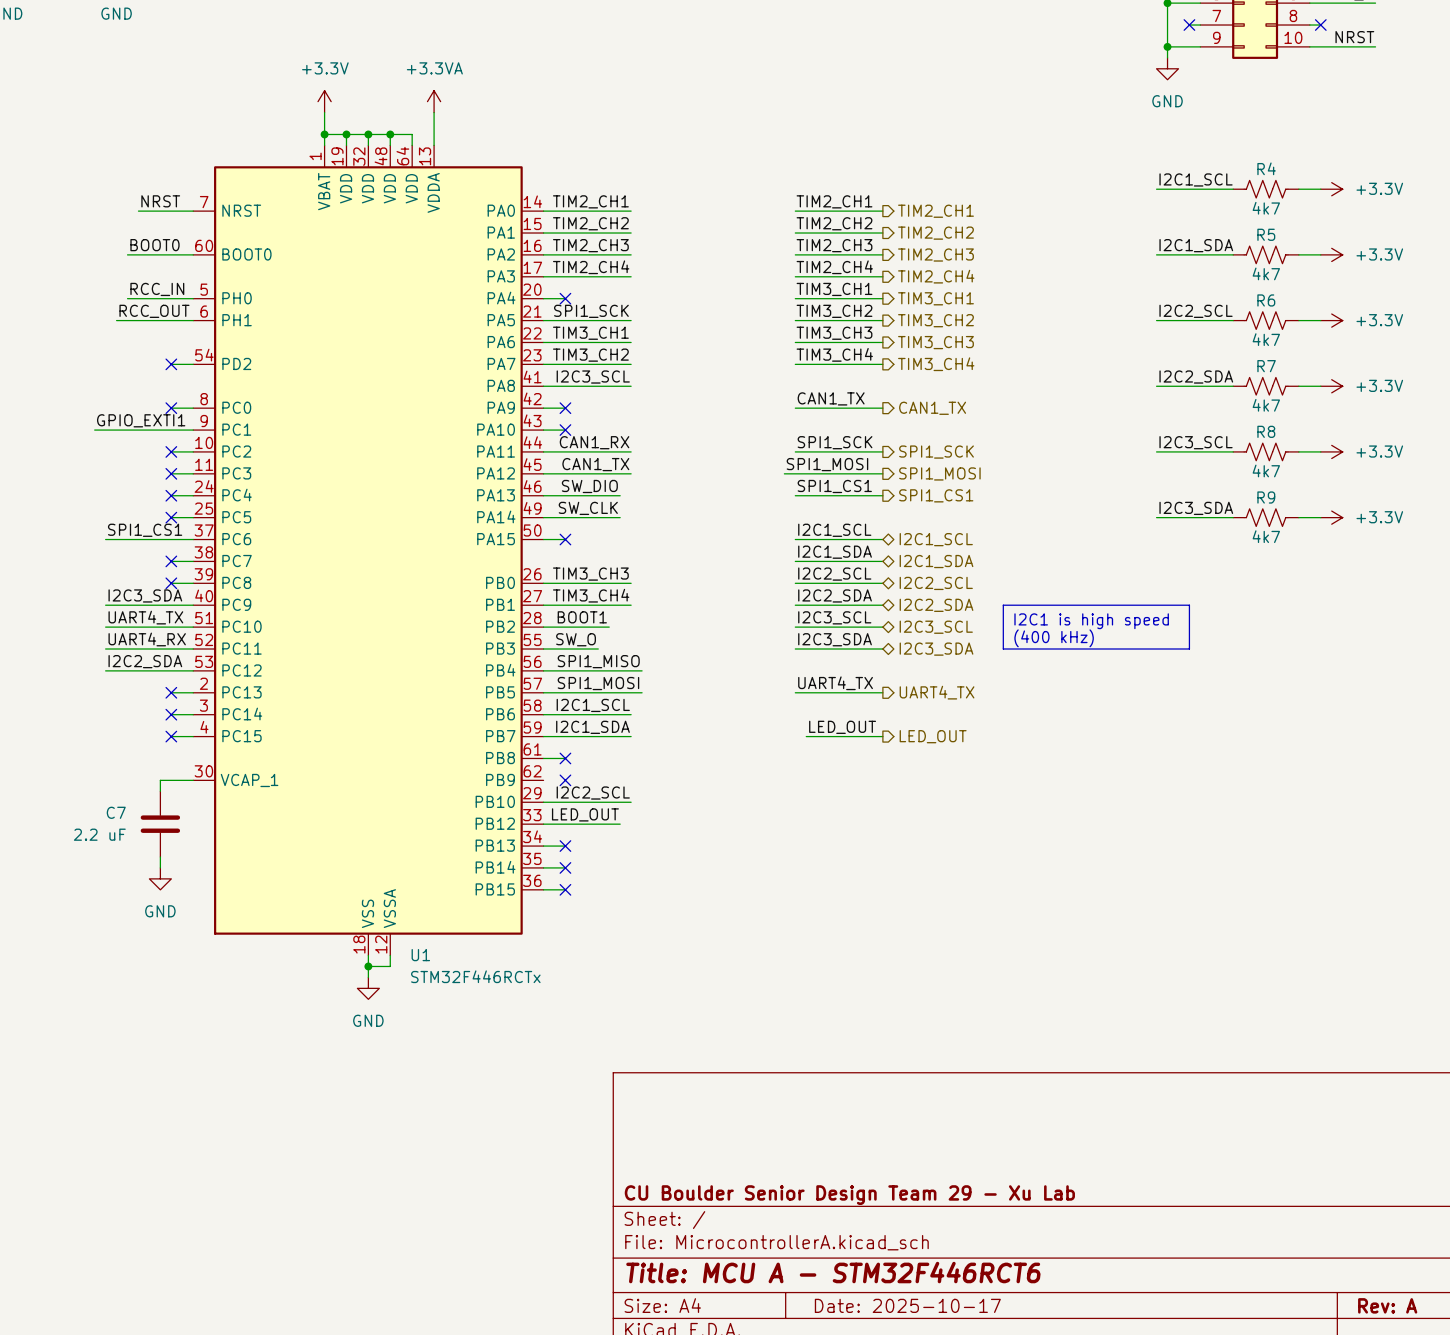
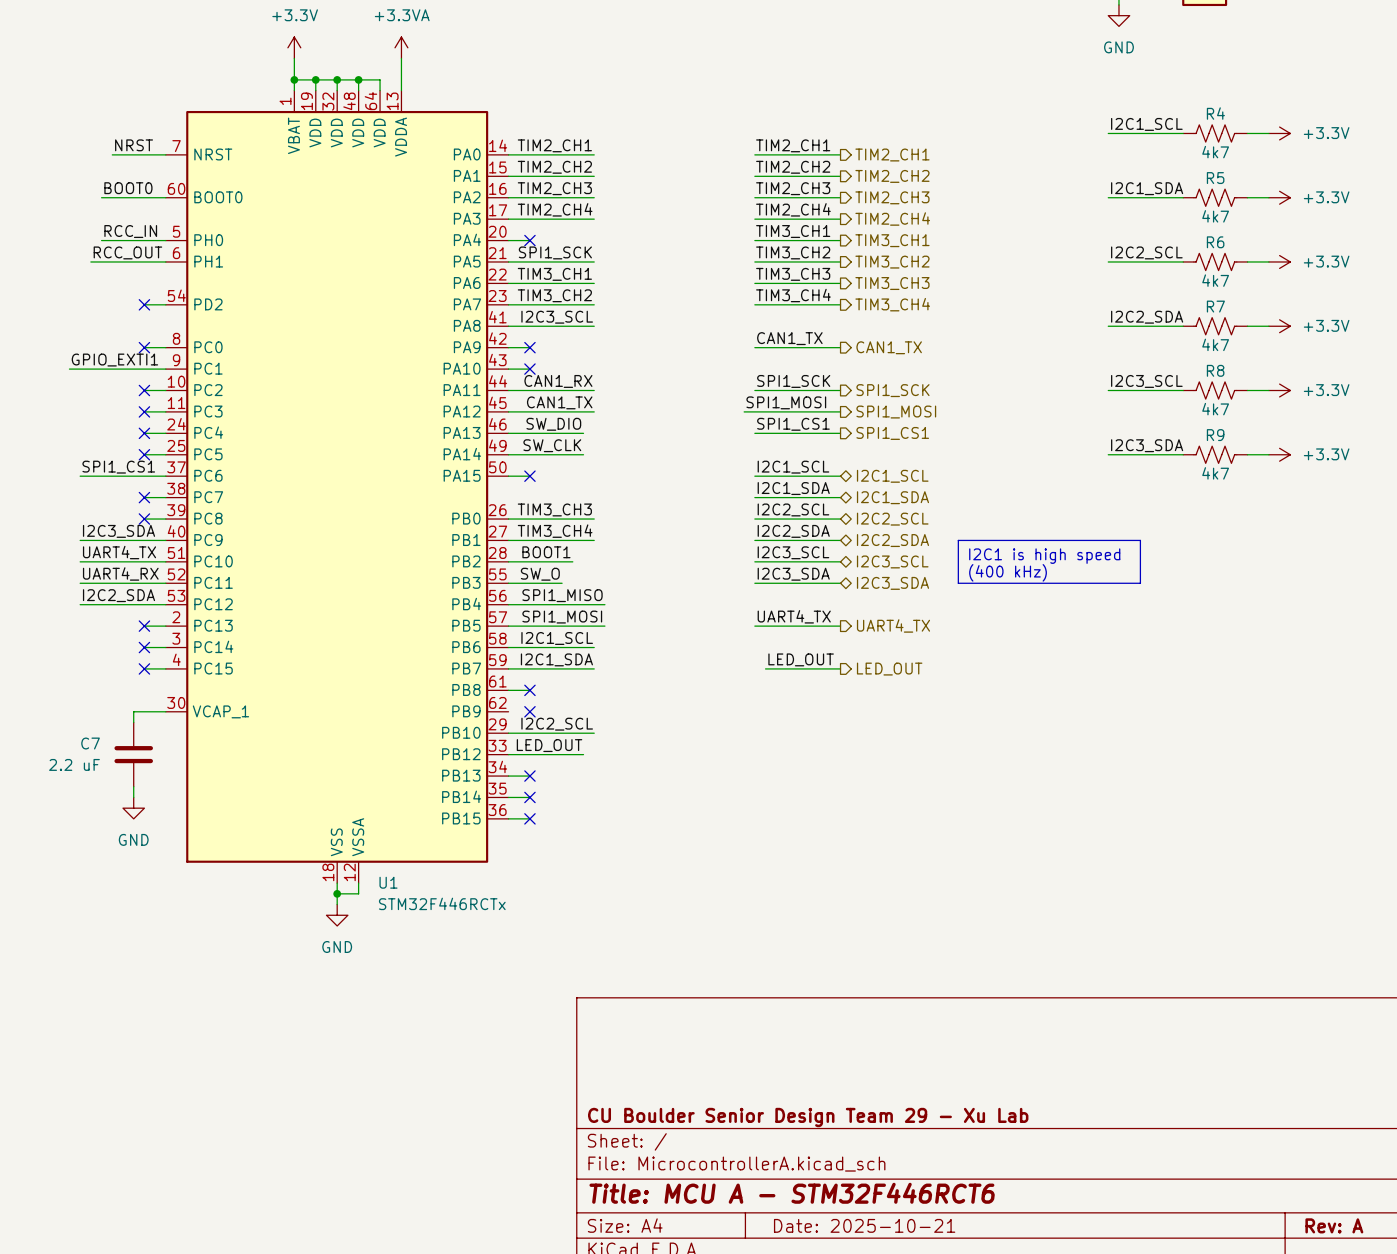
title block: Date: 2025-10-17 (907, 1305) -> Date: 2025-10-21 (864, 1225)

